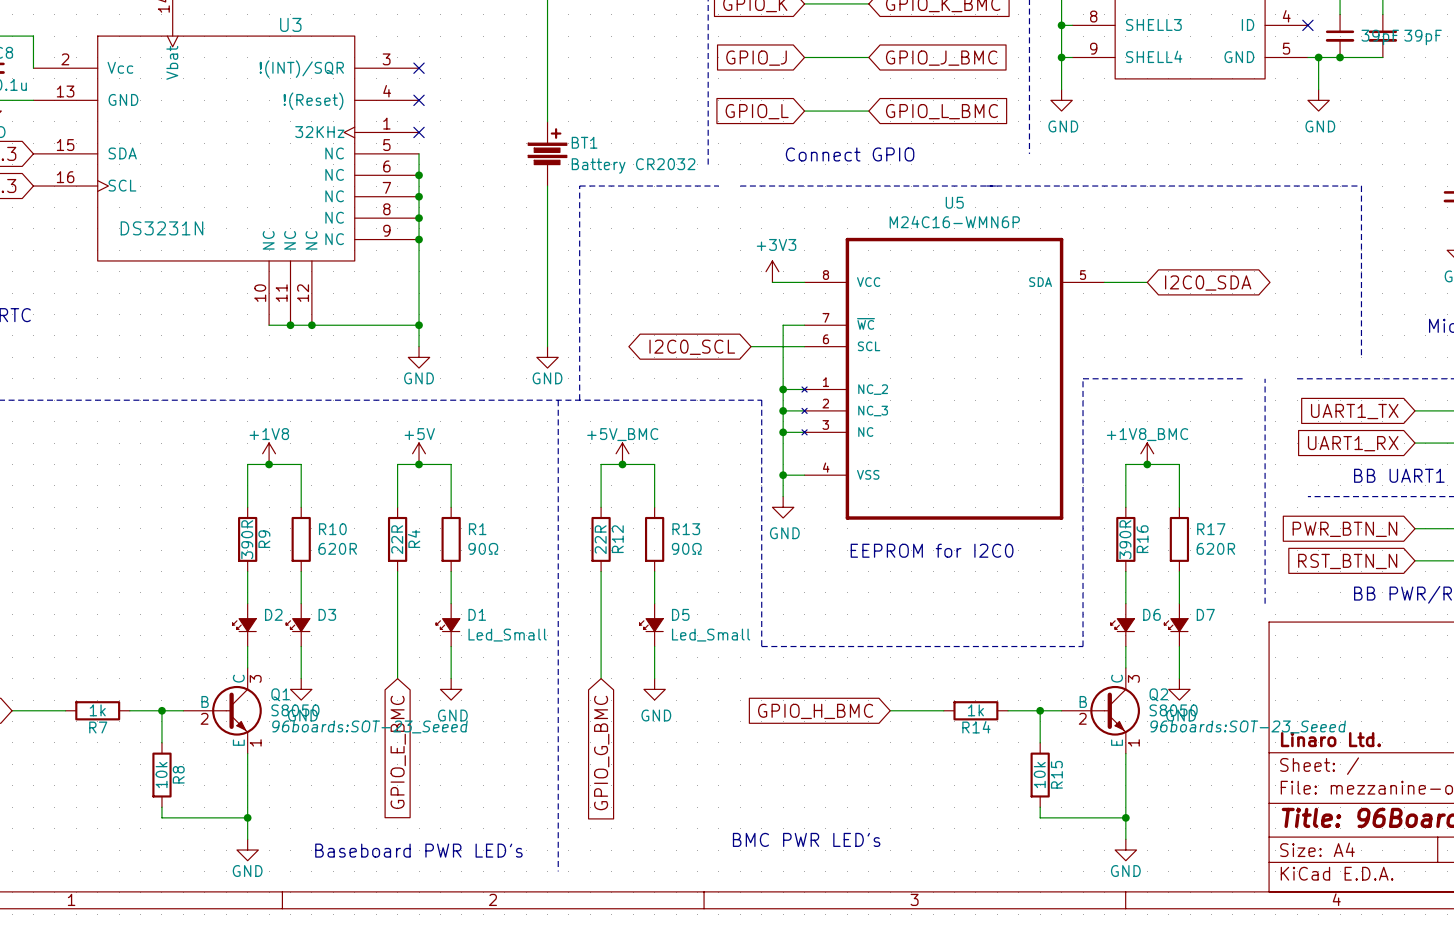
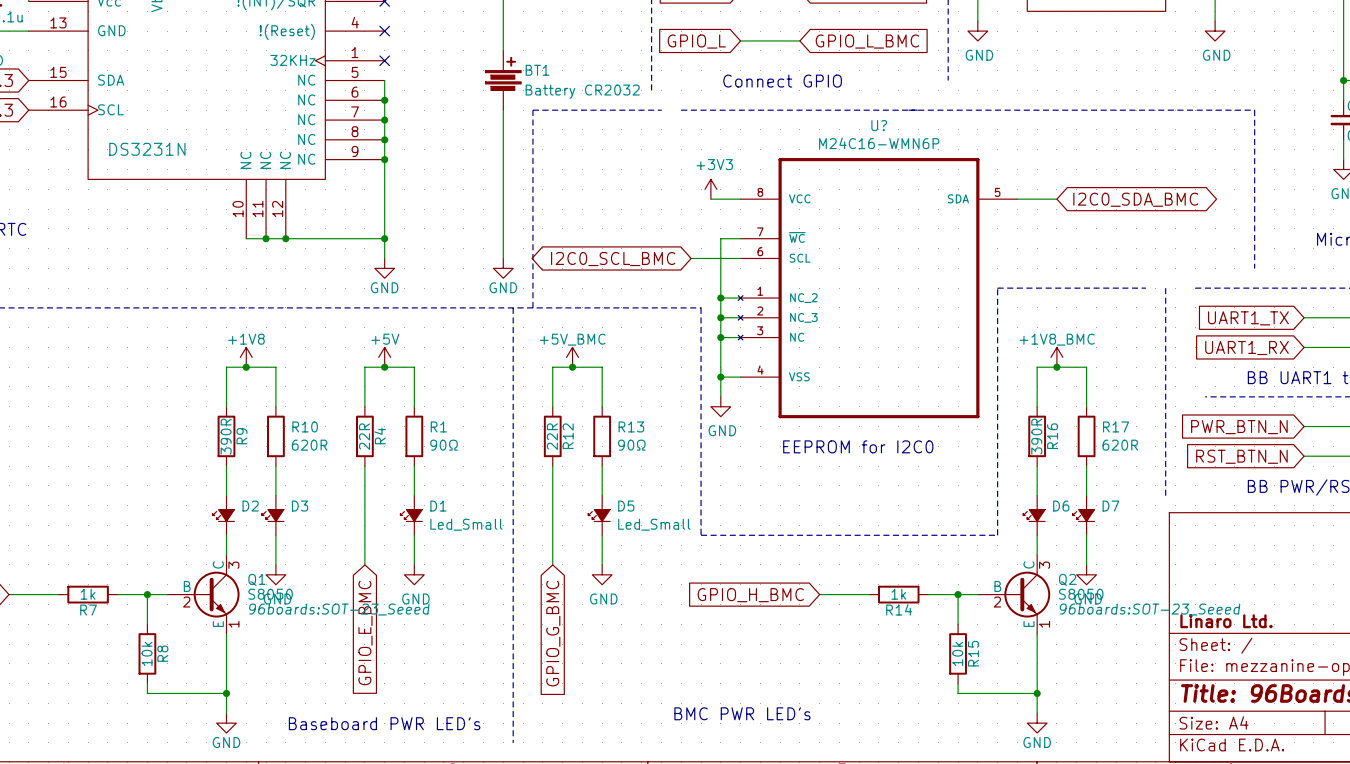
U5 name: U5 (954, 202) -> U? (879, 125)
global label: I2C0_SDA (1208, 283) -> I2C0_SDA_BMC (1135, 199)
global label: I2C0_SCL (692, 347) -> I2C0_SCL_BMC (613, 259)

